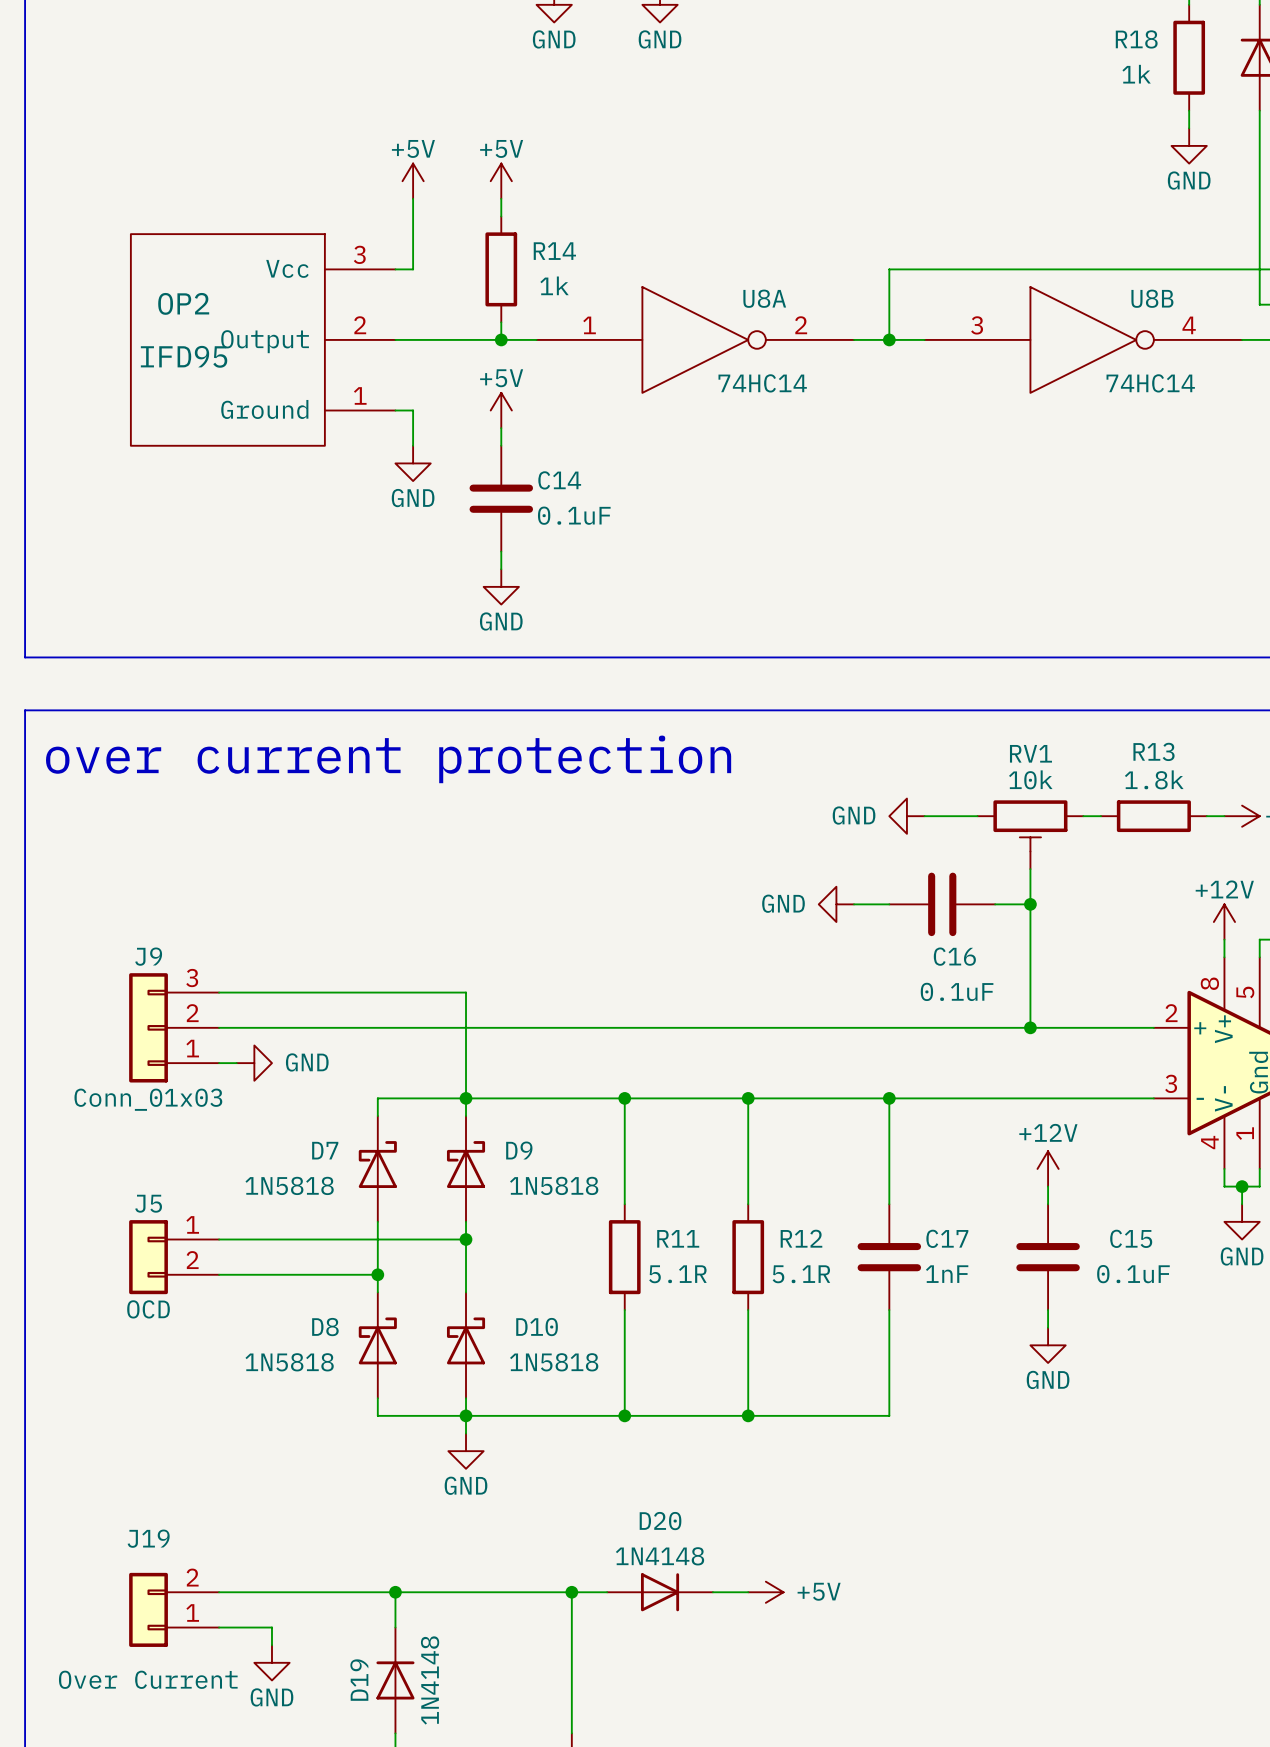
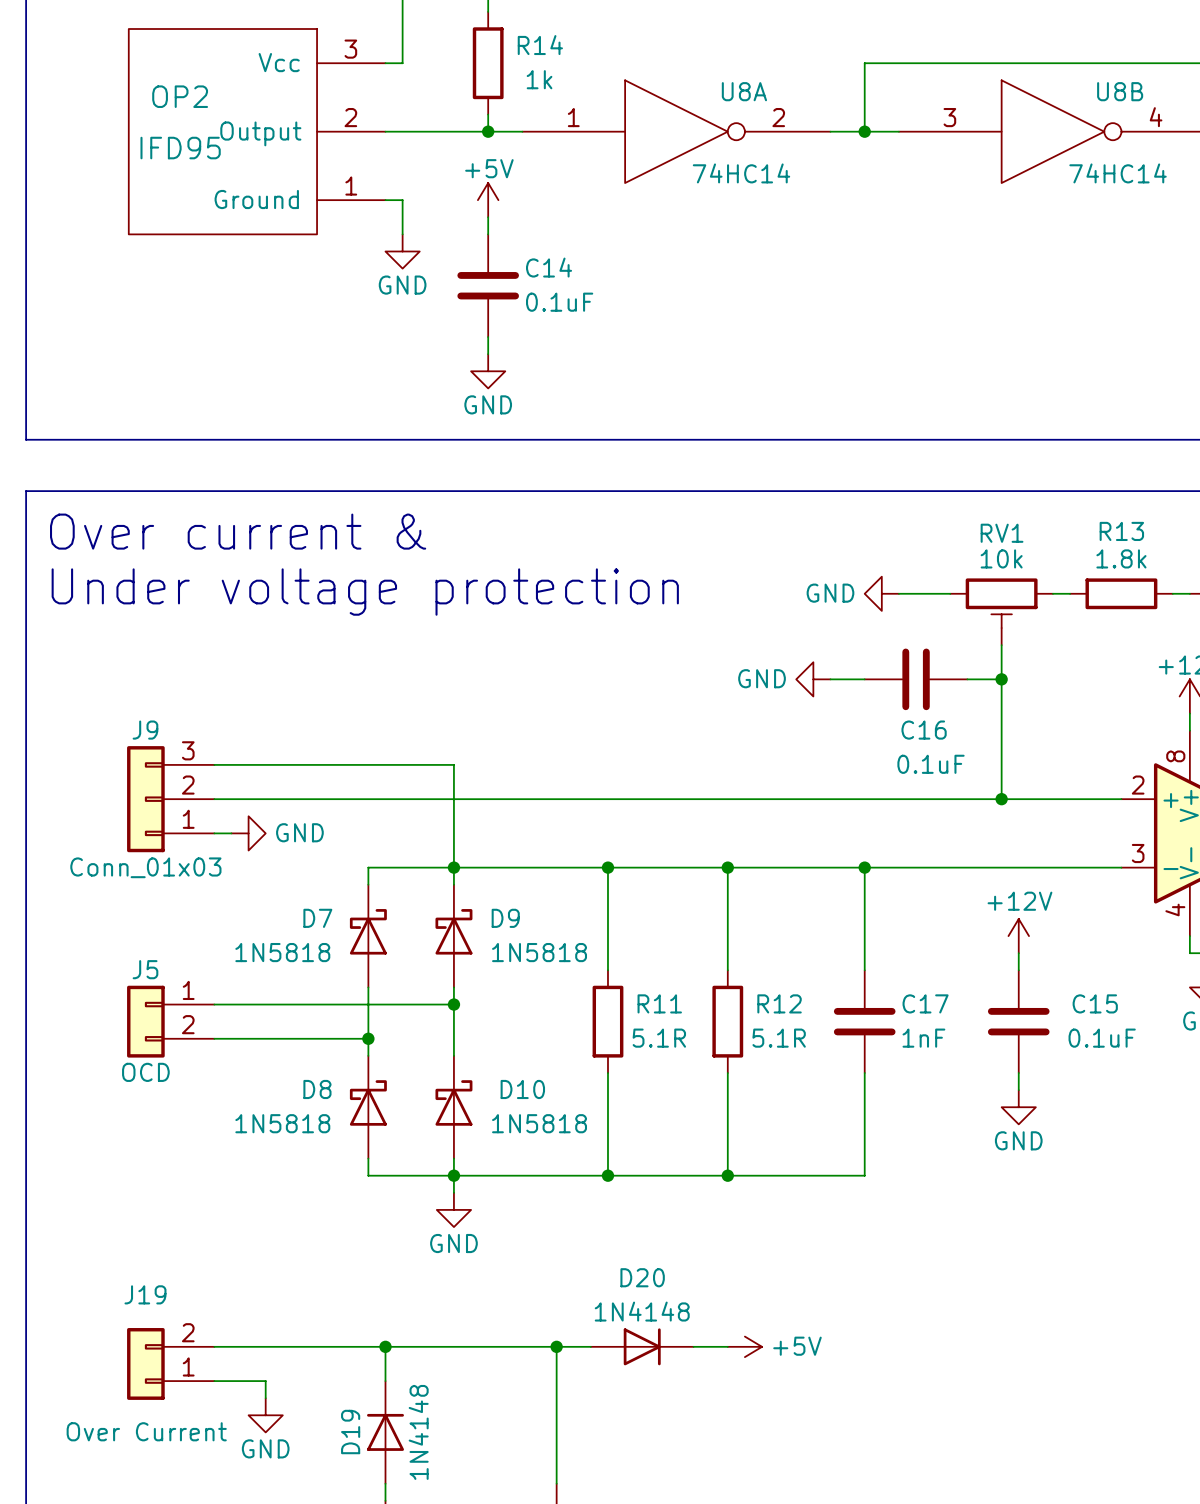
text: over current protection (388, 759) -> Over current & (238, 531)
text: none -> Under voltage protection (365, 592)

